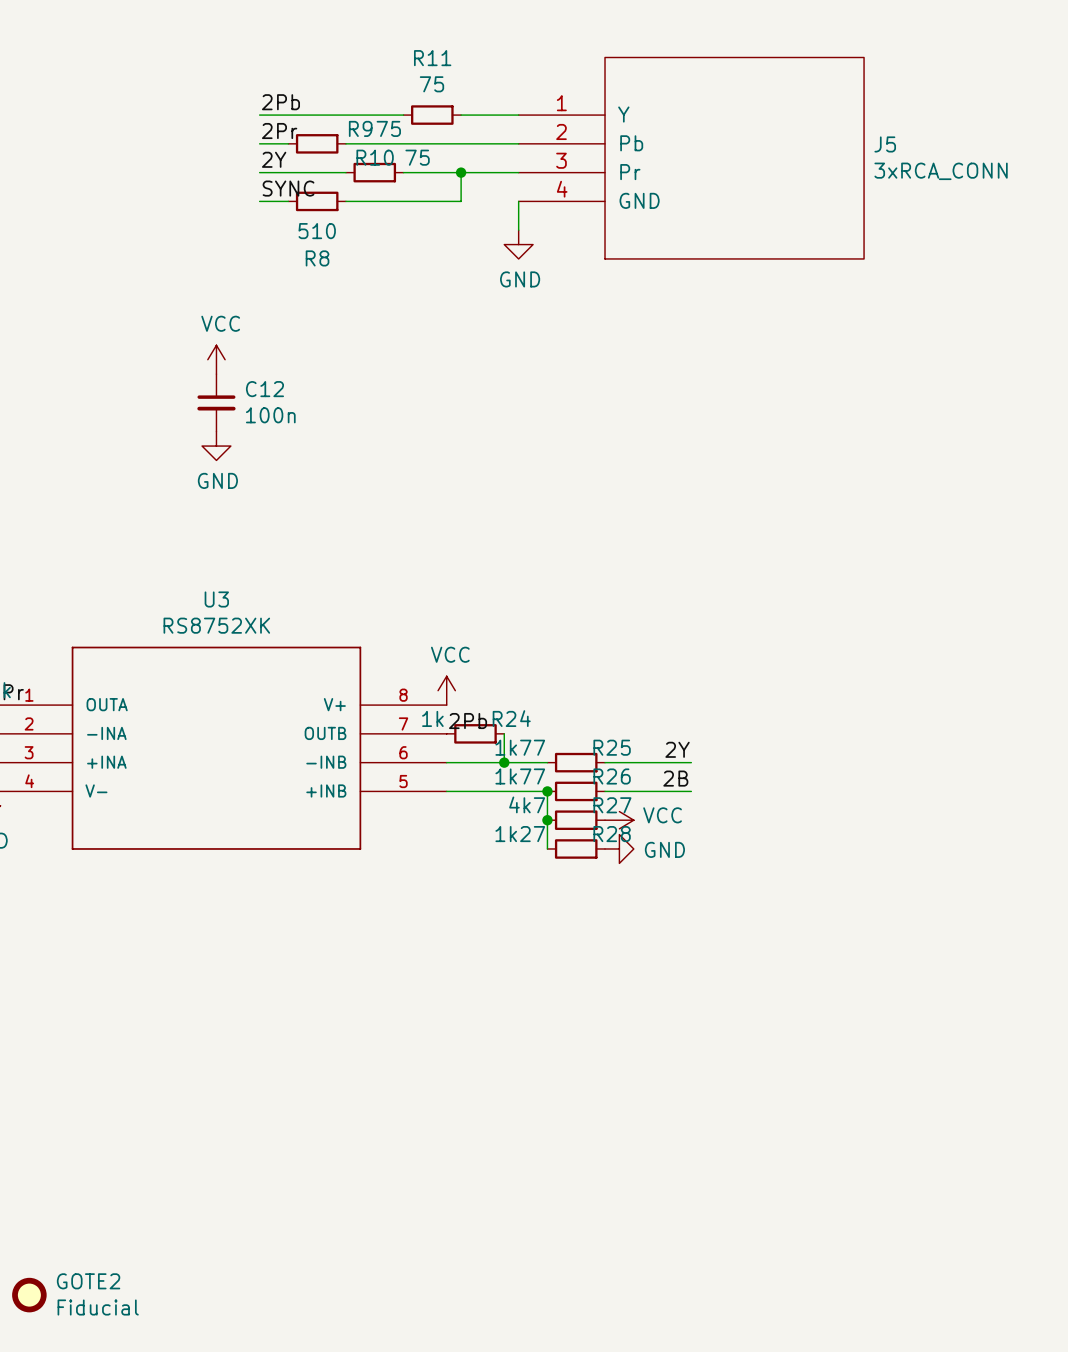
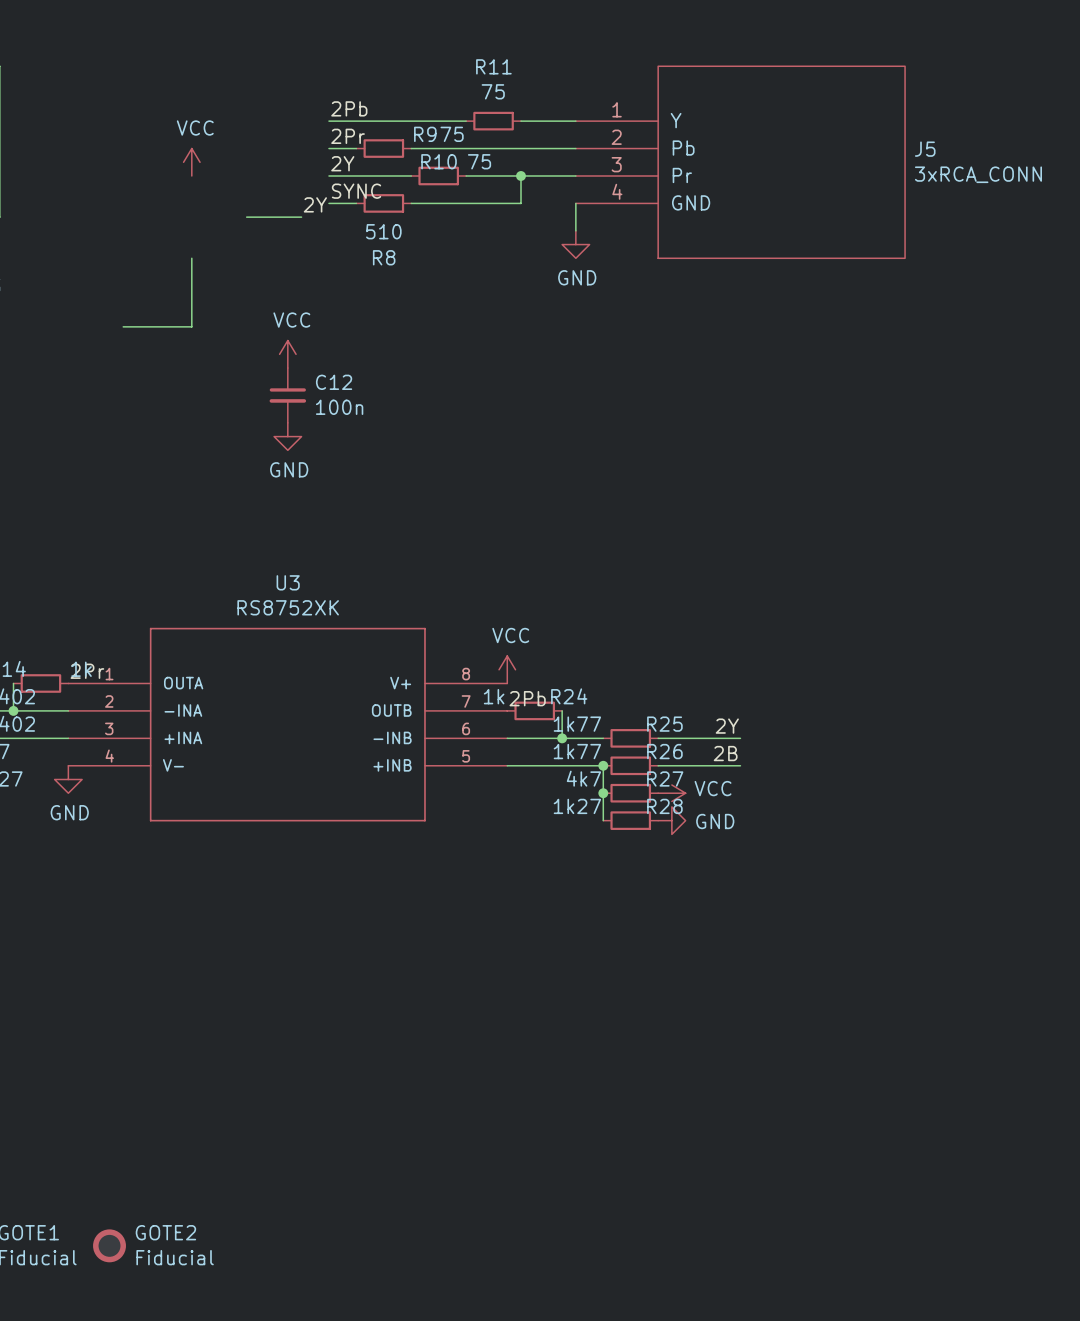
power symbol: none -> VCC (191, 162)
label: none -> 2Y (315, 204)
wire: none -> (246, 217) (301, 217)
wire: none -> (191, 258) (191, 326) (123, 326)

